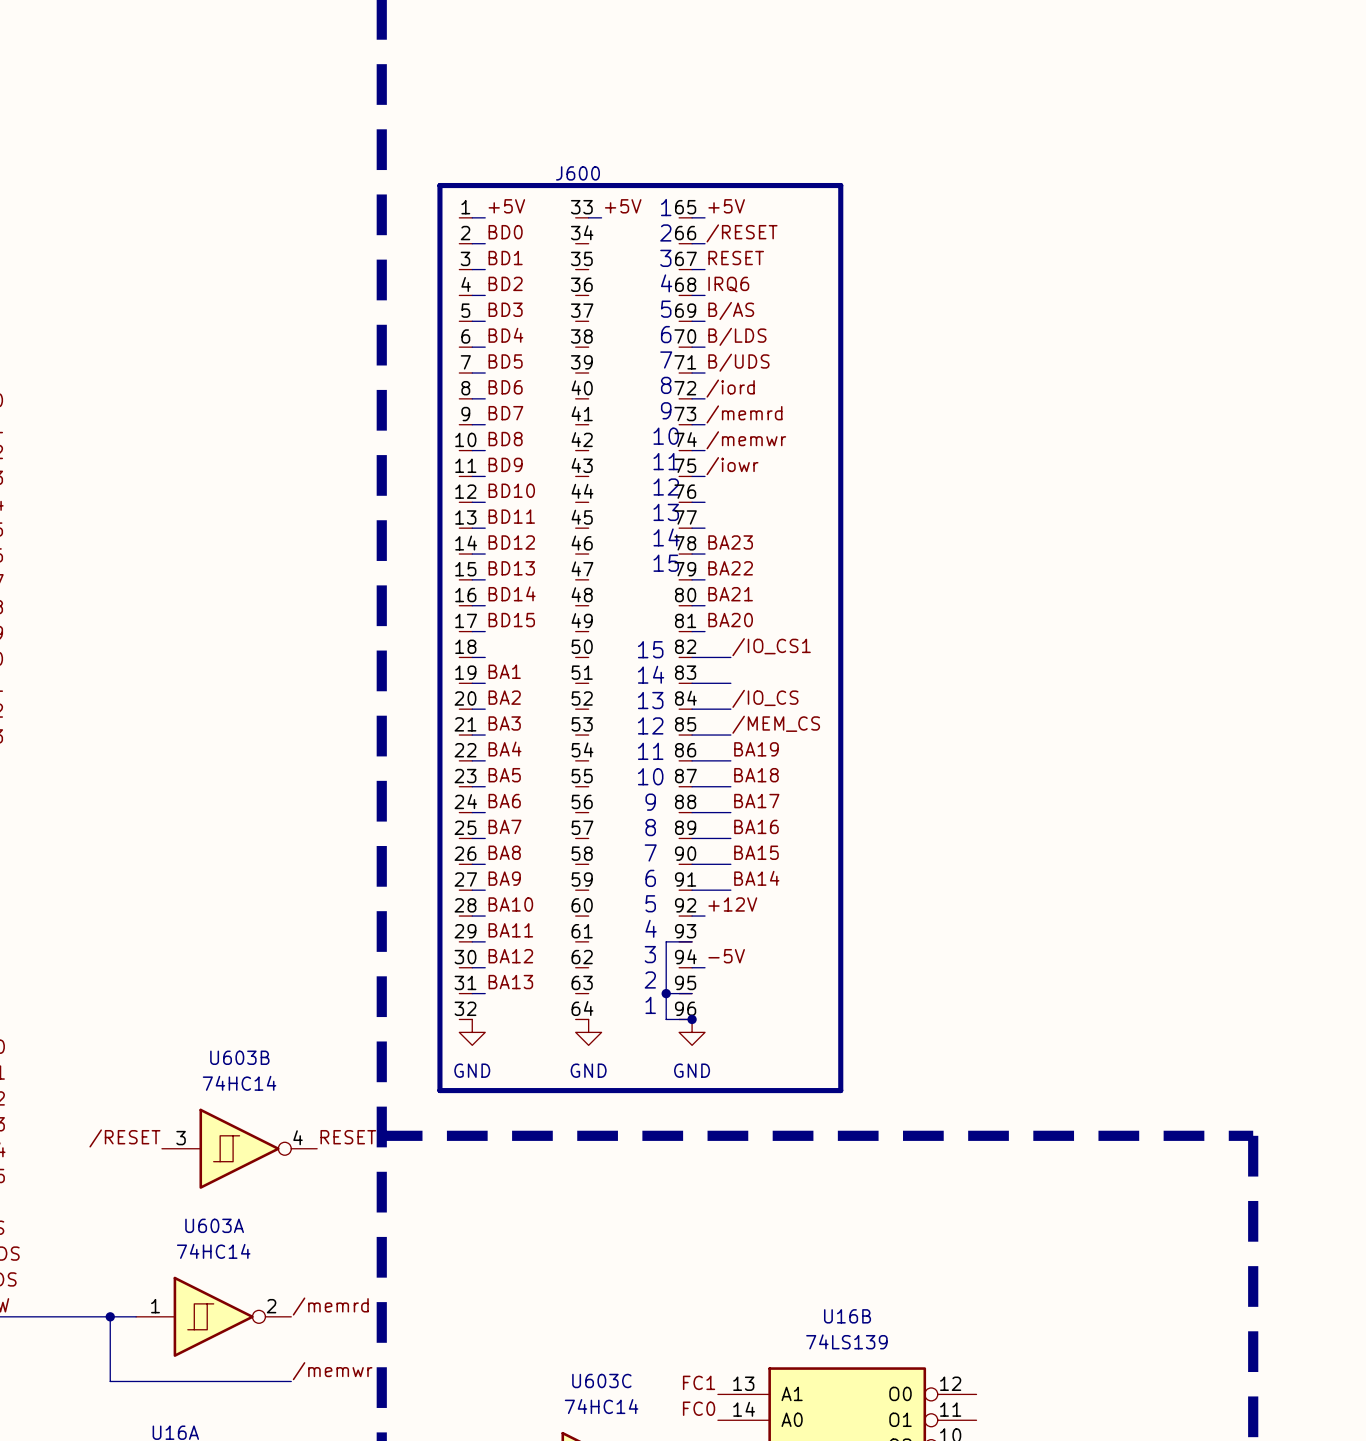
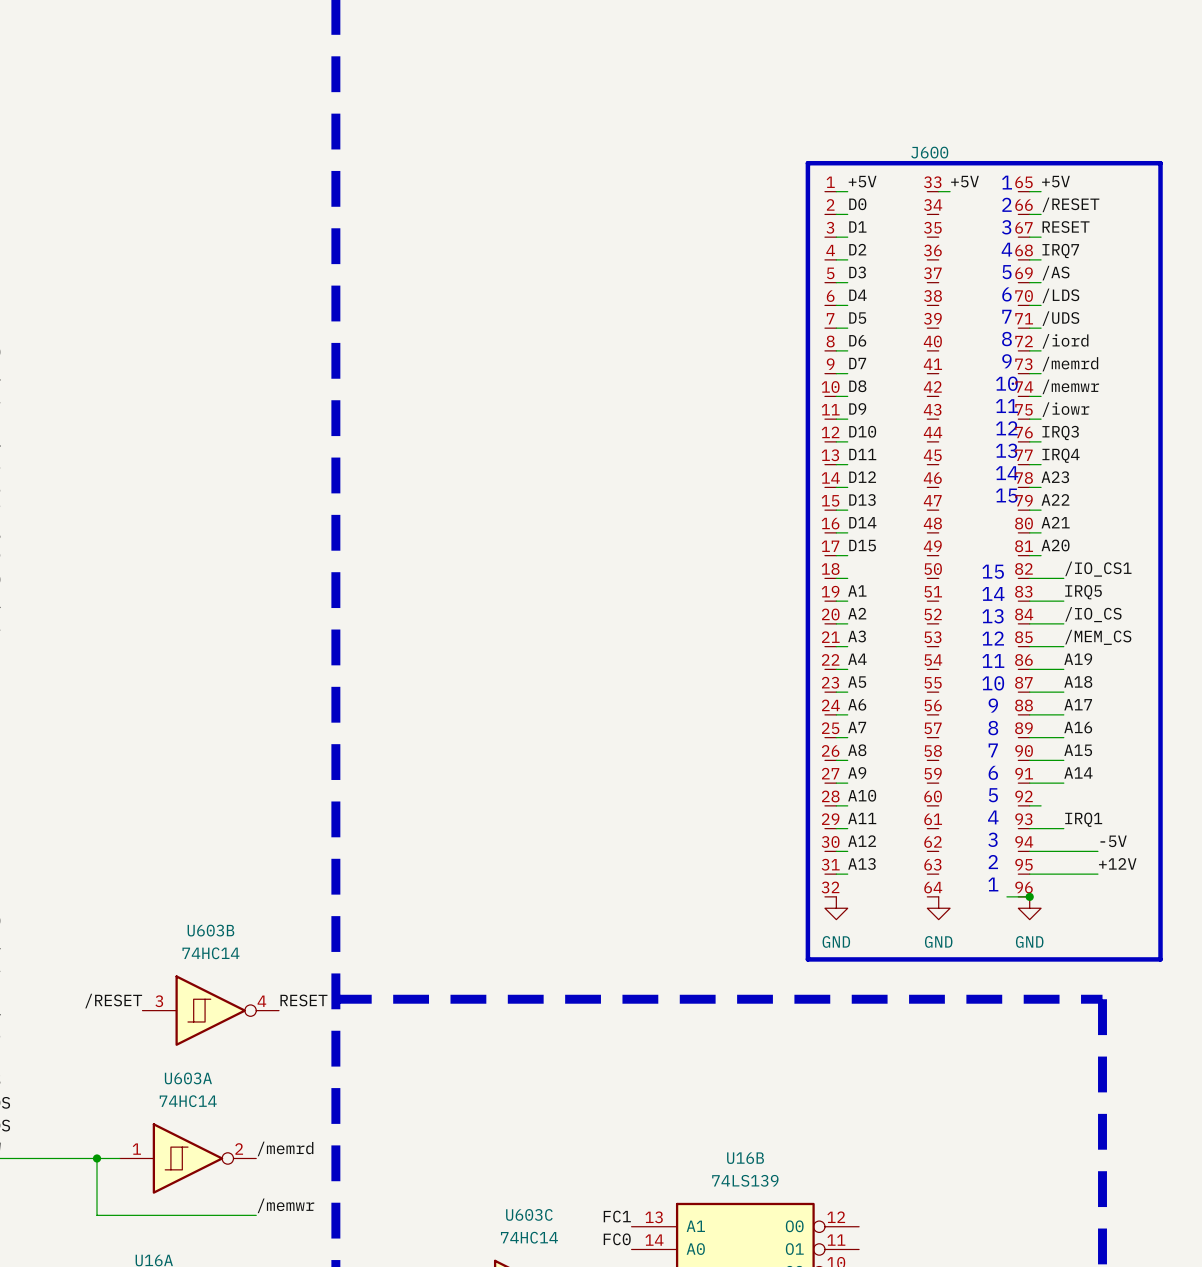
line: (439, 185) (840, 185) (840, 1090) (439, 1090) (439, 185) -> none
line: none -> (807, 163) (1160, 163) (1160, 959) (807, 959) (807, 163)
label: +5V (506, 206) -> none
label: +5V (623, 206) -> none
label: +5V (726, 206) -> none
label: none -> +5V (862, 181)
label: none -> +5V (964, 181)
label: none -> +5V (1055, 181)
text: 1 (666, 207) -> none
text: none -> 1 (1007, 182)
wire: (472, 217) (485, 217) -> none
wire: (588, 217) (601, 217) -> none
wire: (692, 217) (704, 217) -> none
wire: none -> (836, 191) (847, 191)
wire: none -> (938, 191) (950, 191)
wire: none -> (1029, 191) (1041, 191)
label: BD0 (505, 232) -> none
text: 2 (665, 232) -> none
label: none -> D0 (857, 204)
text: none -> 2 (1006, 204)
label: /RESET (742, 233) -> none
label: none -> /RESET (1070, 204)
wire: (472, 243) (485, 243) -> none
wire: (692, 243) (704, 243) -> none
wire: none -> (836, 214) (847, 214)
wire: none -> (1029, 214) (1041, 214)
label: BD1 (505, 258) -> none
text: 3 (665, 258) -> none
label: RESET (736, 258) -> none
label: none -> D1 (857, 227)
text: none -> 3 (1006, 227)
label: none -> RESET (1066, 227)
wire: (472, 269) (485, 269) -> none
wire: (692, 269) (704, 269) -> none
wire: none -> (836, 237) (847, 237)
wire: none -> (1029, 237) (1041, 237)
label: BD2 (505, 283) -> none
text: 4 (666, 283) -> none
label: none -> D2 (857, 249)
text: none -> 4 (1006, 249)
label: IRQ6 (728, 284) -> none
label: none -> IRQ7 (1060, 250)
wire: (472, 295) (485, 295) -> none
wire: (692, 295) (704, 295) -> none
wire: none -> (836, 259) (847, 259)
wire: none -> (1029, 259) (1041, 259)
label: BD3 (505, 309) -> none
text: 5 (666, 309) -> none
label: none -> D3 (857, 272)
text: none -> 5 (1007, 272)
label: B/AS (731, 310) -> none
label: none -> /AS (1056, 273)
wire: (472, 321) (485, 321) -> none
wire: (692, 321) (704, 321) -> none
wire: none -> (836, 282) (847, 282)
wire: none -> (1029, 282) (1041, 282)
text: 6 (666, 334) -> none
text: none -> 6 (1006, 294)
label: BD4 (505, 335) -> none
label: none -> D4 (857, 295)
label: B/LDS (737, 336) -> none
label: none -> /LDS (1060, 295)
wire: (472, 347) (485, 347) -> none
wire: (692, 347) (704, 347) -> none
wire: none -> (836, 305) (847, 305)
wire: none -> (1029, 305) (1041, 305)
text: 7 (666, 359) -> none
text: none -> 7 (1006, 316)
label: BD5 (505, 361) -> none
label: none -> D5 (857, 318)
label: B/UDS (738, 362) -> none
label: none -> /UDS (1060, 318)
wire: (472, 373) (485, 373) -> none
wire: (692, 373) (704, 373) -> none
wire: none -> (836, 328) (847, 328)
wire: none -> (1029, 328) (1041, 328)
text: 8 (666, 385) -> none
text: none -> 8 (1006, 339)
label: BD6 (505, 387) -> none
label: none -> D6 (857, 340)
label: /iord (730, 388) -> none
label: none -> /iord (1065, 341)
wire: (472, 398) (485, 398) -> none
wire: (692, 398) (704, 398) -> none
wire: none -> (836, 350) (847, 350)
wire: none -> (1029, 350) (1041, 350)
text: 9 (666, 410) -> none
text: none -> 9 (1006, 361)
label: BD7 (505, 413) -> none
label: none -> D7 (857, 363)
label: /memrd (744, 414) -> none
label: none -> /memrd (1070, 364)
wire: (472, 424) (485, 424) -> none
wire: (692, 424) (704, 424) -> none
wire: none -> (836, 373) (847, 373)
wire: none -> (1029, 373) (1041, 373)
text: 10 (666, 436) -> none
text: none -> 10 (1006, 383)
label: BD8 (505, 439) -> none
label: none -> D8 (857, 386)
label: /memwr (746, 440) -> none
label: none -> /memwr (1070, 386)
wire: (472, 450) (485, 450) -> none
wire: (692, 450) (704, 450) -> none
wire: none -> (836, 396) (847, 396)
wire: none -> (1029, 396) (1041, 396)
text: 11 (666, 461) -> none
text: none -> 11 (1007, 406)
label: BD9 (505, 464) -> none
label: none -> D9 (857, 408)
label: /iowr (732, 466) -> none
label: none -> /iowr (1065, 409)
wire: (472, 476) (485, 476) -> none
wire: (692, 476) (704, 476) -> none
wire: none -> (836, 419) (847, 419)
wire: none -> (1029, 419) (1041, 419)
text: 12 (666, 487) -> none
text: none -> 12 (1006, 428)
label: BD10 (511, 490) -> none
label: none -> D10 (862, 431)
label: none -> IRQ3 (1060, 432)
wire: (472, 502) (485, 502) -> none
wire: (692, 502) (704, 502) -> none
wire: none -> (836, 441) (847, 441)
wire: none -> (1029, 441) (1041, 441)
text: 13 (666, 512) -> none
text: none -> 13 (1006, 450)
label: BD11 (511, 516) -> none
label: none -> D11 (862, 454)
label: none -> IRQ4 (1061, 455)
wire: (472, 528) (485, 528) -> none
wire: (692, 528) (704, 528) -> none
wire: none -> (836, 464) (847, 464)
wire: none -> (1029, 464) (1041, 464)
text: 14 (666, 537) -> none
text: none -> 14 (1007, 473)
label: BD12 (511, 542) -> none
label: BA23 (730, 542) -> none
label: none -> D12 (862, 477)
label: none -> A23 (1055, 477)
wire: (472, 554) (485, 554) -> none
wire: (692, 554) (704, 554) -> none
wire: none -> (836, 487) (847, 487)
wire: none -> (1029, 487) (1041, 487)
text: 15 (666, 563) -> none
text: none -> 15 (1006, 495)
label: BD13 (511, 568) -> none
label: BA22 (730, 568) -> none
label: none -> D13 (862, 499)
label: none -> A22 (1055, 499)
wire: (472, 579) (485, 579) -> none
wire: (692, 579) (704, 579) -> none
wire: none -> (836, 510) (847, 510)
wire: none -> (1029, 510) (1041, 510)
label: BD14 (512, 593) -> none
label: none -> D14 (862, 522)
label: BA21 (730, 594) -> none
label: none -> A21 (1055, 522)
wire: (472, 605) (485, 605) -> none
wire: (692, 605) (704, 605) -> none
wire: none -> (836, 532) (847, 532)
wire: none -> (1029, 532) (1041, 532)
J600 position: (575, 618) -> (927, 544)
label: BD15 (511, 620) -> none
label: BA20 (730, 620) -> none
label: none -> D15 (862, 545)
label: none -> A20 (1055, 545)
wire: (472, 631) (485, 631) -> none
wire: (692, 631) (704, 631) -> none
wire: none -> (836, 555) (847, 555)
wire: none -> (1029, 555) (1041, 555)
label: /IO_CS1 (771, 647) -> none
label: none -> /IO_CS1 (1098, 569)
text: 15 (650, 649) -> none
text: none -> 15 (993, 571)
wire: (472, 657) (485, 657) -> none
wire: (692, 657) (730, 657) -> none
wire: none -> (836, 578) (847, 578)
wire: none -> (1029, 578) (1063, 578)
label: BA1 (504, 671) -> none
label: none -> A1 (857, 590)
label: none -> IRQ5 (1083, 592)
text: 14 (651, 674) -> none
text: none -> 14 (993, 593)
wire: (472, 683) (485, 683) -> none
wire: (692, 683) (730, 683) -> none
wire: none -> (836, 601) (847, 601)
wire: none -> (1029, 601) (1063, 601)
label: BA2 (504, 697) -> none
label: none -> A2 (857, 613)
label: /IO_CS (765, 698) -> none
label: none -> /IO_CS (1093, 614)
text: 13 (650, 700) -> none
text: none -> 13 (993, 616)
wire: (472, 709) (485, 709) -> none
wire: (692, 709) (730, 709) -> none
wire: none -> (836, 623) (847, 623)
wire: none -> (1029, 623) (1063, 623)
label: BA3 (504, 723) -> none
label: none -> A3 (857, 636)
label: /MEM_CS (776, 724) -> none
label: none -> /MEM_CS (1098, 637)
text: 12 (650, 725) -> none
text: none -> 12 (993, 638)
wire: (472, 735) (485, 735) -> none
wire: (692, 735) (730, 735) -> none
wire: none -> (836, 646) (847, 646)
wire: none -> (1029, 646) (1063, 646)
label: BA4 (505, 749) -> none
label: BA19 (756, 749) -> none
label: none -> A4 (857, 659)
label: none -> A19 (1078, 659)
text: 11 (650, 751) -> none
text: none -> 11 (993, 661)
wire: (472, 760) (485, 760) -> none
wire: (692, 760) (730, 760) -> none
wire: none -> (836, 669) (847, 669)
wire: none -> (1029, 669) (1063, 669)
label: BA5 (504, 775) -> none
label: BA18 (756, 775) -> none
label: none -> A5 (857, 682)
label: none -> A18 (1078, 681)
text: 10 (650, 776) -> none
text: none -> 10 (993, 683)
wire: (472, 786) (485, 786) -> none
wire: (692, 786) (730, 786) -> none
wire: none -> (836, 692) (847, 692)
wire: none -> (1029, 692) (1063, 692)
label: BA6 (504, 801) -> none
label: BA17 (756, 801) -> none
label: none -> A6 (857, 704)
label: none -> A17 (1078, 704)
text: 9 (650, 802) -> none
text: none -> 9 (993, 705)
wire: (472, 812) (485, 812) -> none
wire: (692, 812) (730, 812) -> none
wire: none -> (836, 714) (847, 714)
wire: none -> (1029, 714) (1063, 714)
label: BA7 (505, 826) -> none
label: BA16 (756, 826) -> none
label: none -> A7 (857, 727)
label: none -> A16 (1078, 727)
text: 8 (650, 827) -> none
text: none -> 8 (993, 728)
wire: (472, 838) (485, 838) -> none
wire: (692, 838) (730, 838) -> none
wire: none -> (836, 737) (847, 737)
wire: none -> (1029, 737) (1063, 737)
label: BA8 (504, 852) -> none
text: 7 (650, 852) -> none
label: BA15 (756, 852) -> none
label: none -> A8 (857, 750)
text: none -> 7 (993, 750)
label: none -> A15 (1078, 750)
wire: (472, 864) (485, 864) -> none
wire: (692, 864) (730, 864) -> none
wire: none -> (836, 760) (847, 760)
wire: none -> (1029, 760) (1063, 760)
label: BA9 (504, 878) -> none
text: 6 (650, 878) -> none
label: BA14 (756, 878) -> none
label: none -> A9 (857, 772)
text: none -> 6 (993, 772)
label: none -> A14 (1078, 772)
wire: (472, 890) (485, 890) -> none
wire: (692, 890) (730, 890) -> none
wire: none -> (836, 783) (847, 783)
wire: none -> (1029, 783) (1063, 783)
text: 5 (650, 903) -> none
text: none -> 5 (993, 795)
label: BA10 (510, 904) -> none
label: +12V (732, 904) -> none
label: none -> A10 (862, 795)
wire: (472, 916) (485, 916) -> none
wire: (692, 916) (704, 916) -> none
wire: none -> (836, 805) (847, 805)
wire: none -> (1029, 805) (1041, 805)
text: 4 (651, 928) -> none
text: none -> 4 (993, 817)
label: BA11 (510, 930) -> none
label: none -> A11 (862, 818)
label: none -> IRQ1 (1083, 819)
wire: (472, 941) (485, 941) -> none
wire: (692, 941) (666, 941) (666, 1019) (692, 1019) -> none
wire: none -> (836, 828) (847, 828)
wire: none -> (1029, 828) (1063, 828)
text: 3 (650, 954) -> none
text: none -> 3 (992, 839)
label: BA12 (510, 956) -> none
label: -5V (726, 956) -> none
label: none -> A12 (862, 841)
label: none -> -5V (1113, 841)
wire: (472, 967) (485, 967) -> none
wire: (692, 967) (704, 967) -> none
wire: none -> (836, 851) (847, 851)
wire: none -> (1029, 851) (1097, 851)
text: 2 (650, 979) -> none
text: none -> 2 (993, 862)
label: BA13 (510, 982) -> none
label: none -> A13 (861, 863)
label: none -> +12V (1117, 863)
wire: (472, 993) (485, 993) -> none
wire: (666, 993) (692, 993) -> none
junction: (666, 993) -> none
wire: none -> (836, 874) (847, 874)
wire: none -> (1029, 874) (1097, 874)
text: 1 (650, 1005) -> none
text: none -> 1 (993, 884)
junction: (692, 1019) -> none
wire: none -> (1006, 896) (1029, 896)
junction: none -> (1029, 896)
power symbol: GND (472, 1032) -> none
power symbol: GND (588, 1032) -> none
power symbol: GND (692, 1032) -> none
power symbol: none -> GND (836, 908)
power symbol: none -> GND (938, 908)
power symbol: none -> GND (1029, 908)

